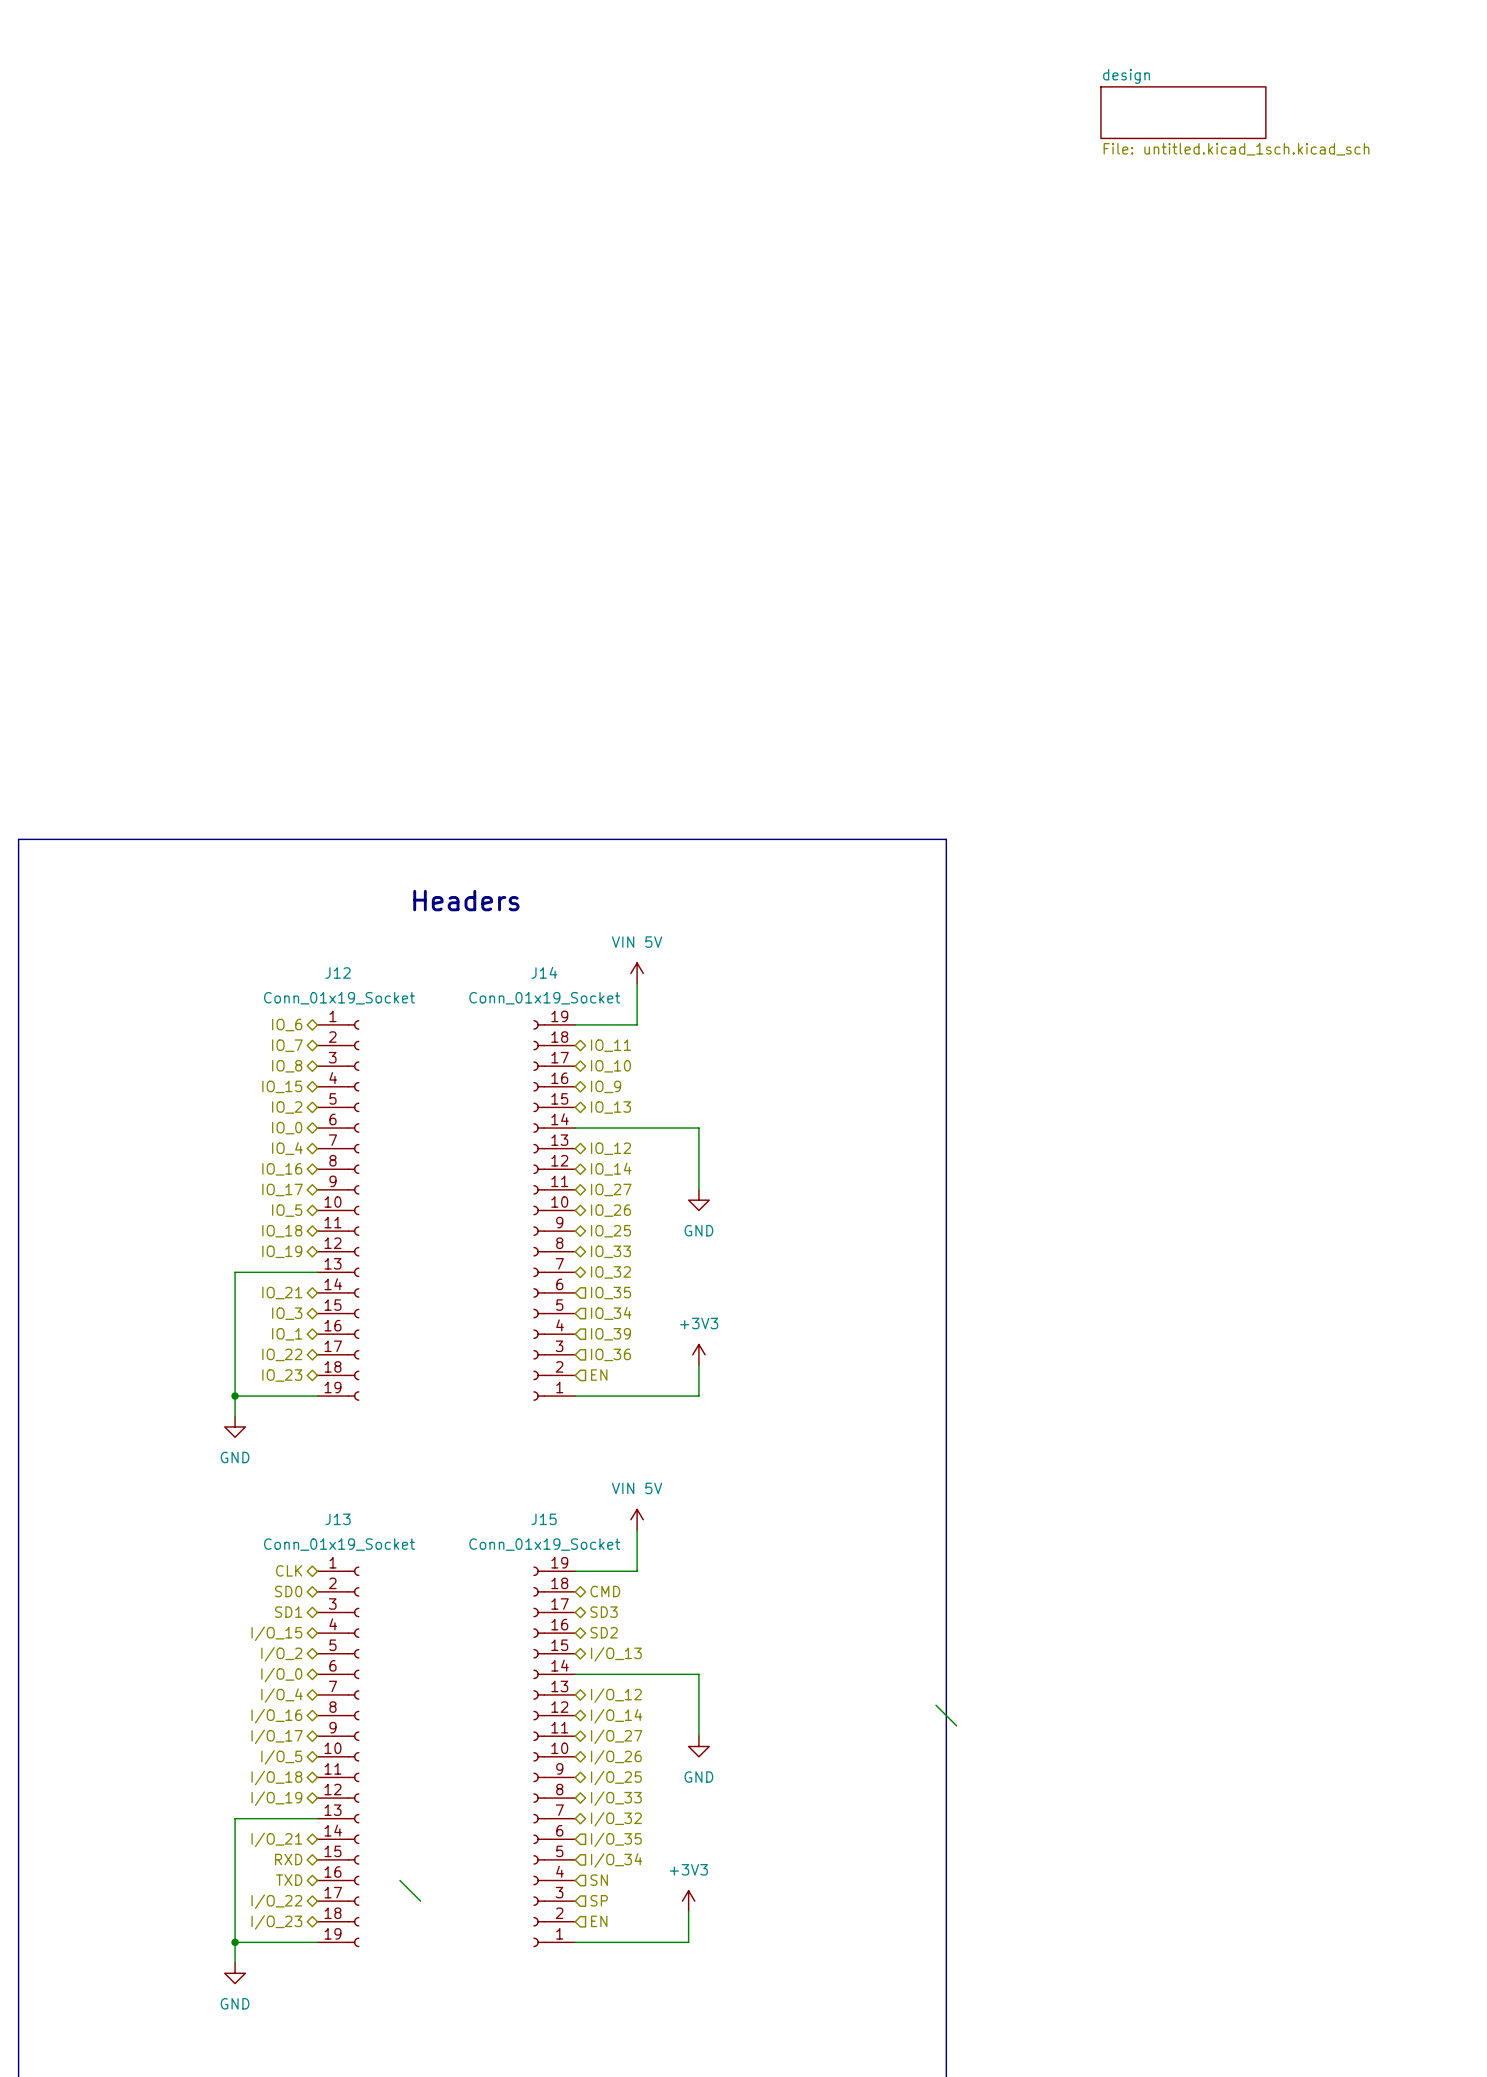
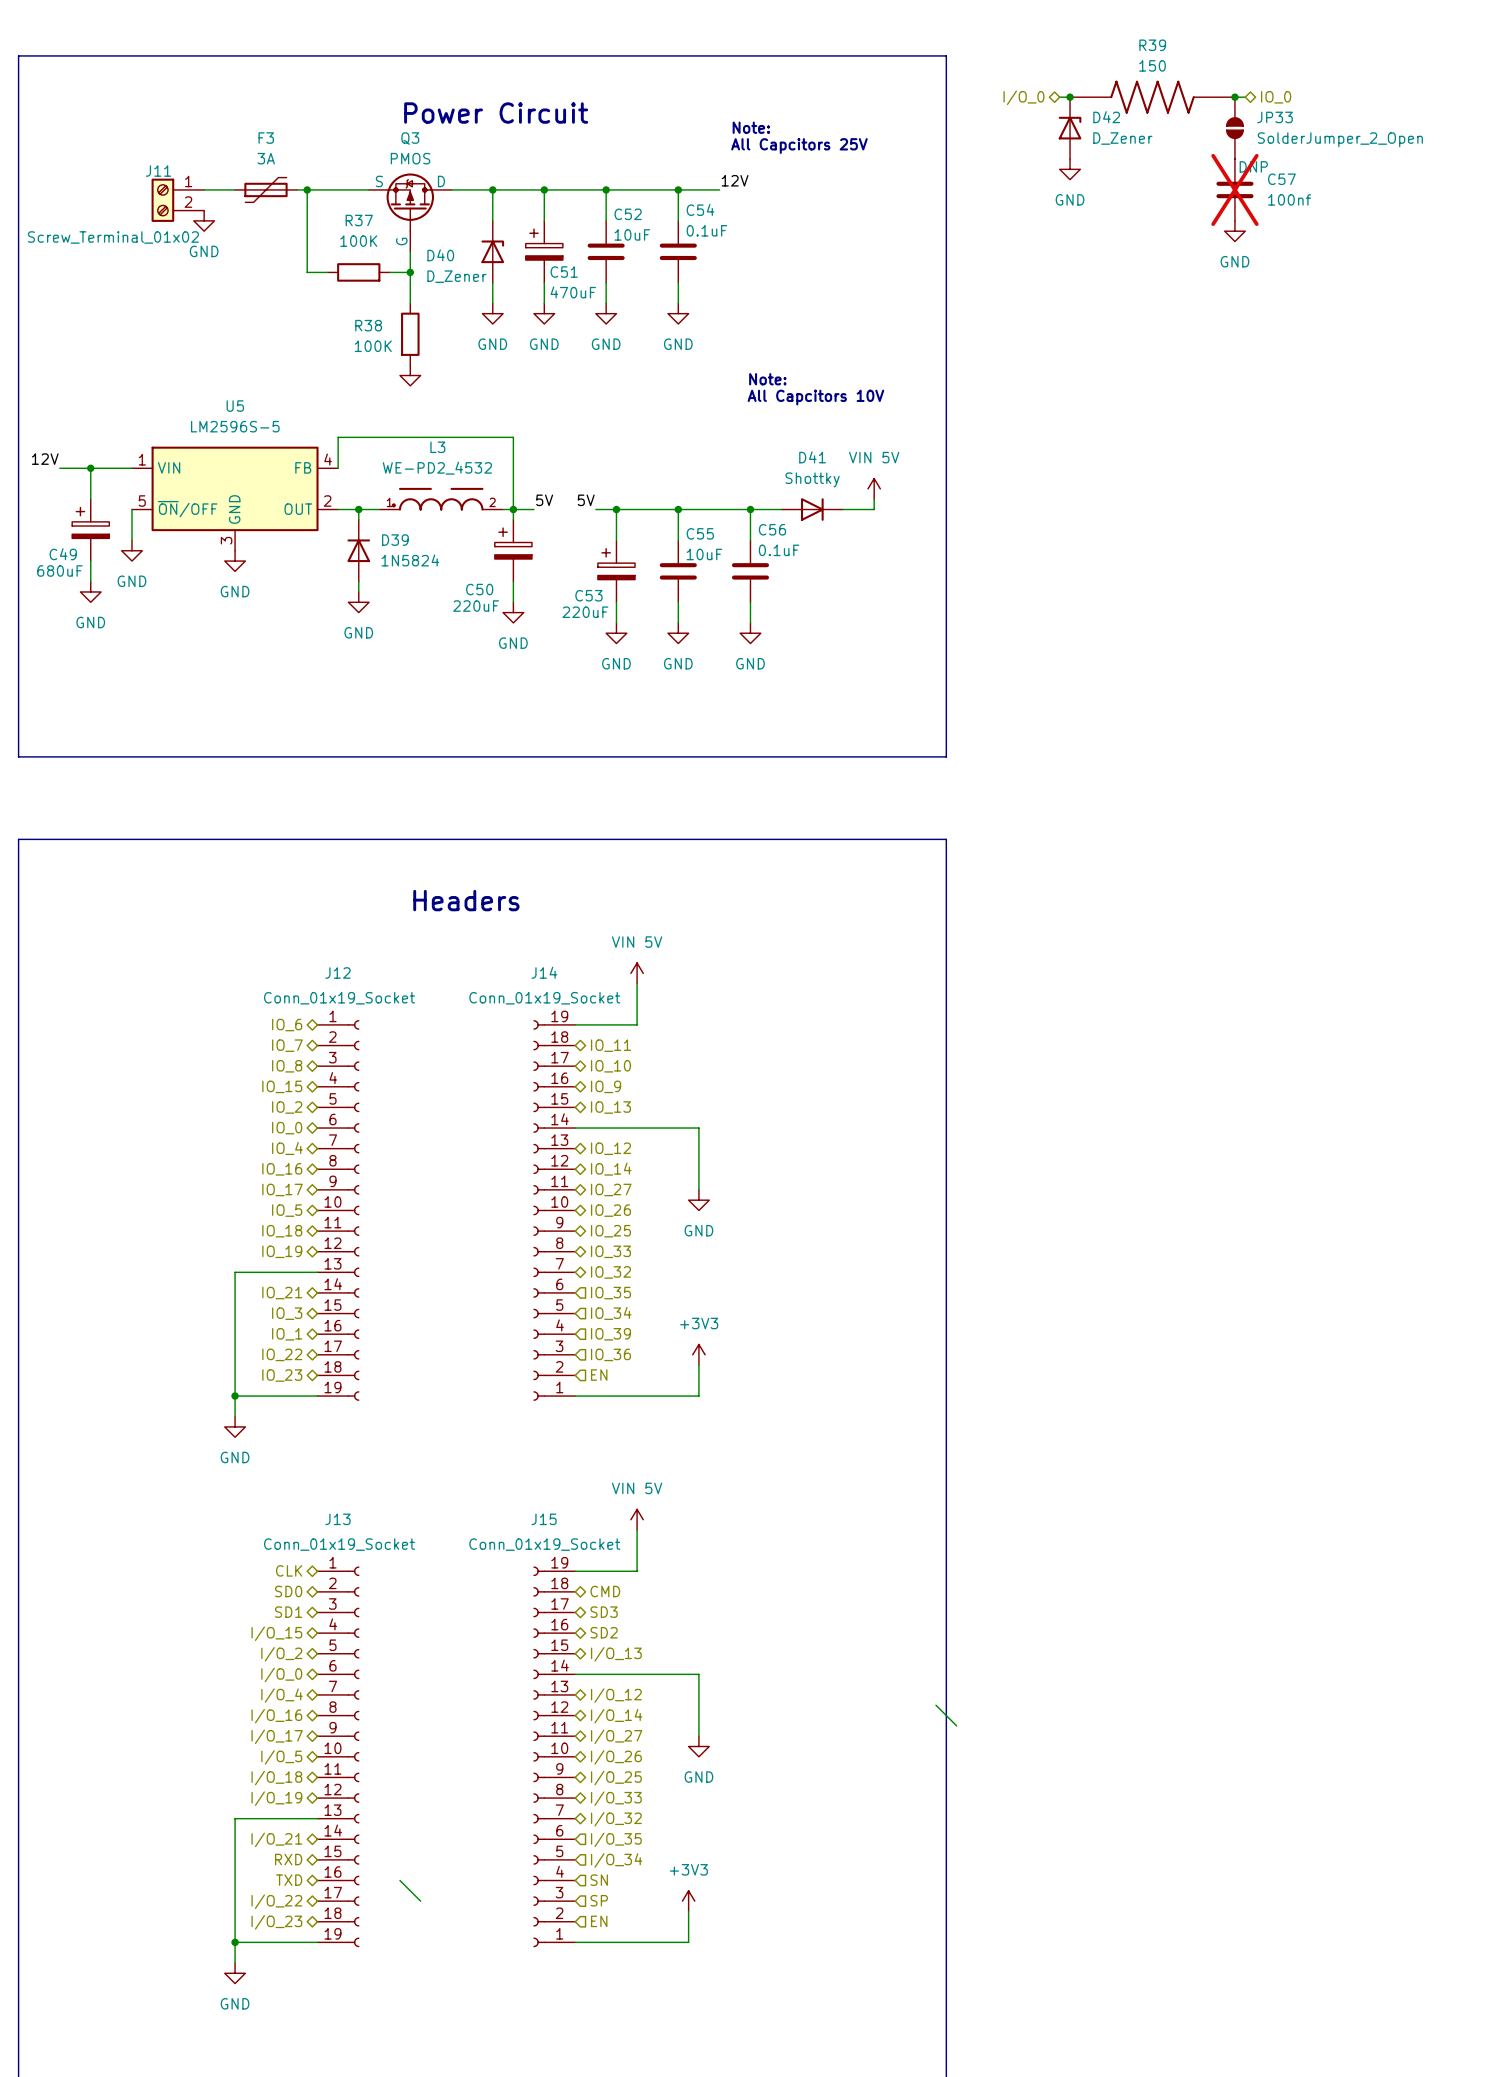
line: none -> (18, 55) (946, 55) (946, 756) (18, 756) (18, 55)
hierarchical label: none -> I/O_0 (1023, 97)
wire: none -> (1059, 97) (1070, 97)
junction: none -> (1070, 97)
R39: none -> 150 (1152, 97)
wire: none -> (1234, 97) (1245, 97)
junction: none -> (1234, 97)
hierarchical label: none -> IO_0 (1276, 97)
sheet design: File: untitled.kicad_1sch.kicad_sch (1183, 112) -> none
text: none -> Power Circuit (496, 113)
text: none -> Note: (751, 127)
D42: none -> D_Zener (1070, 128)
JP33: none -> SolderJumper_2_Open (1234, 128)
text: none -> All Capcitors 25V (799, 146)
power symbol: none -> GND (1070, 169)
label: none -> 12V (735, 180)
wire: none -> (204, 189) (235, 189)
F3: none -> 3A (265, 189)
wire: none -> (296, 189) (369, 189)
wire: none -> (307, 189) (307, 272) (327, 272)
junction: none -> (307, 189)
wire: none -> (451, 189) (719, 189)
wire: none -> (492, 189) (492, 220)
junction: none -> (492, 189)
wire: none -> (544, 189) (544, 220)
junction: none -> (544, 189)
wire: none -> (606, 189) (606, 220)
junction: none -> (606, 189)
wire: none -> (678, 189) (678, 220)
junction: none -> (678, 189)
C57: none -> 100nf (1234, 189)
J11: none -> Screw_Terminal_01x02 (177, 200)
Q3: none -> PMOS (410, 212)
power symbol: none -> GND (204, 220)
power symbol: none -> GND (1234, 231)
wire: none -> (410, 251) (410, 303)
D40: none -> D_Zener (492, 251)
C51: none -> 470uF (544, 251)
C52: none -> 10uF (606, 251)
C54: none -> 0.1uF (678, 251)
R37: none -> 100K (358, 272)
wire: none -> (389, 272) (410, 272)
junction: none -> (410, 272)
wire: none -> (492, 282) (492, 303)
wire: none -> (544, 282) (544, 303)
wire: none -> (606, 282) (606, 303)
wire: none -> (678, 282) (678, 303)
power symbol: none -> GND (492, 313)
power symbol: none -> GND (544, 313)
power symbol: none -> GND (606, 313)
power symbol: none -> GND (678, 313)
R38: none -> 100K (410, 334)
power symbol: none -> (410, 375)
text: none -> Note: (767, 379)
text: none -> All Capcitors 10V (815, 397)
label: none -> 12V (45, 459)
wire: none -> (59, 468) (131, 468)
wire: none -> (90, 468) (90, 499)
junction: none -> (90, 468)
wire: none -> (338, 468) (338, 437) (513, 437) (513, 519)
power symbol: none -> VIN 5V (874, 488)
U5: none -> LM2596S-5 (235, 498)
L3: none -> WE-PD2_4532 (441, 499)
wire: none -> (874, 499) (874, 509) (843, 509)
label: none -> 5V (544, 500)
label: none -> 5V (586, 500)
wire: none -> (131, 509) (131, 540)
wire: none -> (338, 509) (379, 509)
wire: none -> (358, 509) (358, 519)
junction: none -> (358, 509)
wire: none -> (503, 509) (534, 509)
junction: none -> (513, 509)
wire: none -> (595, 509) (781, 509)
wire: none -> (616, 509) (616, 540)
junction: none -> (616, 509)
wire: none -> (678, 509) (678, 540)
junction: none -> (678, 509)
wire: none -> (750, 509) (750, 540)
junction: none -> (750, 509)
D41: none -> Shottky (812, 509)
C49: none -> 680uF (90, 530)
power symbol: none -> GND (131, 550)
D39: none -> 1N5824 (358, 550)
C50: none -> 220uF (513, 550)
wire: none -> (90, 561) (90, 581)
power symbol: none -> GND (235, 561)
C53: none -> 220uF (616, 571)
C55: none -> 10uF (678, 571)
C56: none -> 0.1uF (750, 571)
wire: none -> (358, 581) (358, 591)
wire: none -> (513, 581) (513, 602)
power symbol: none -> GND (90, 591)
power symbol: none -> GND (358, 602)
wire: none -> (616, 602) (616, 622)
wire: none -> (678, 602) (678, 622)
wire: none -> (750, 602) (750, 622)
power symbol: none -> GND (513, 612)
power symbol: none -> GND (616, 633)
power symbol: none -> GND (678, 633)
power symbol: none -> GND (750, 633)

